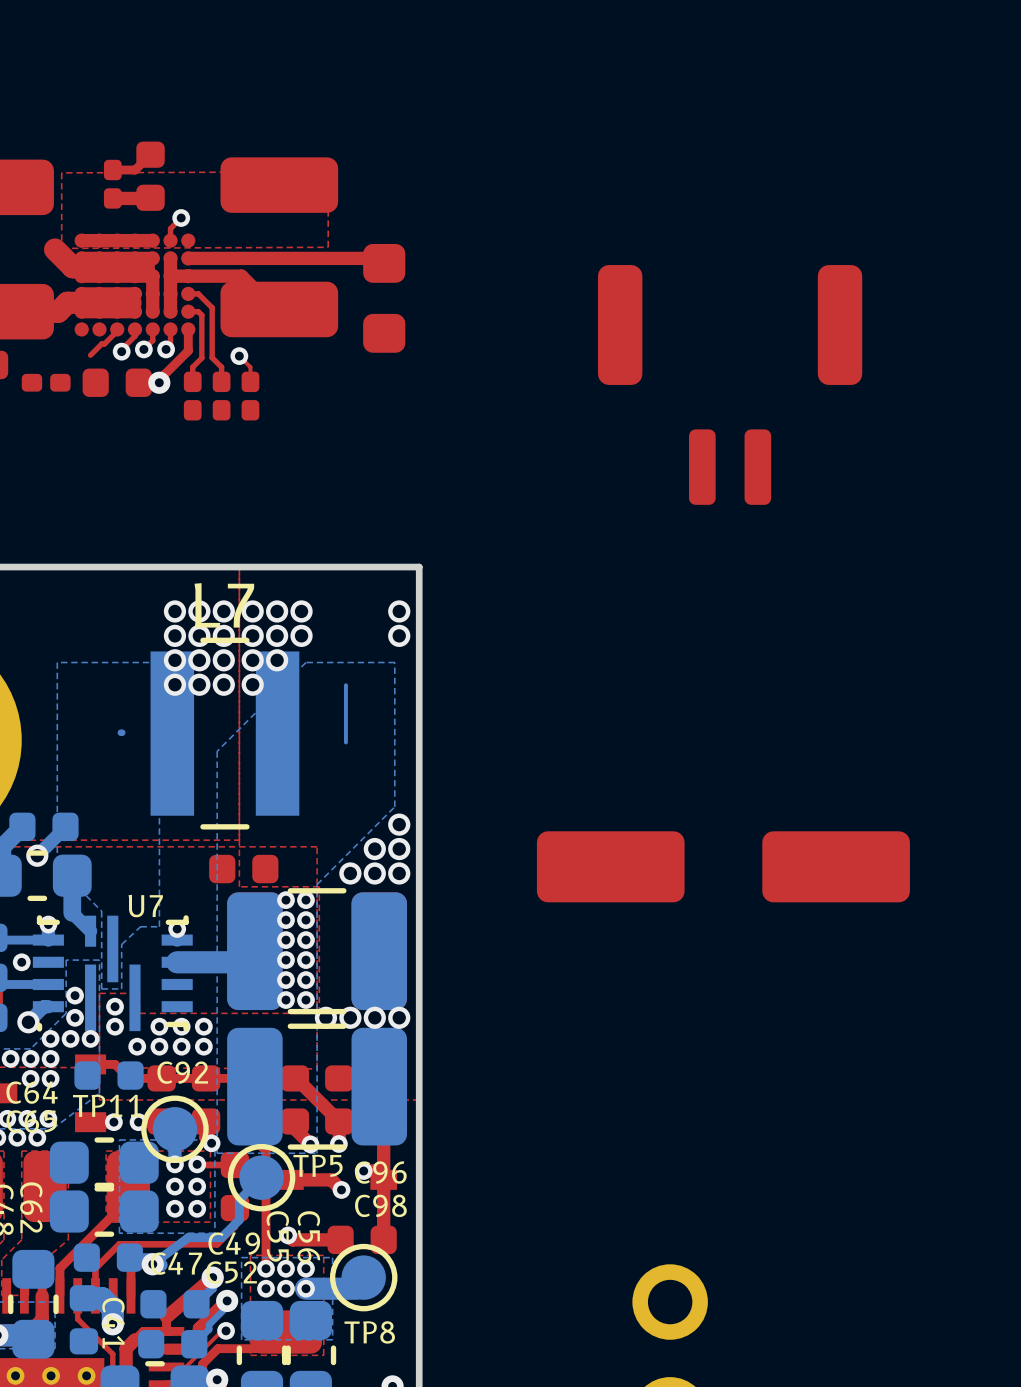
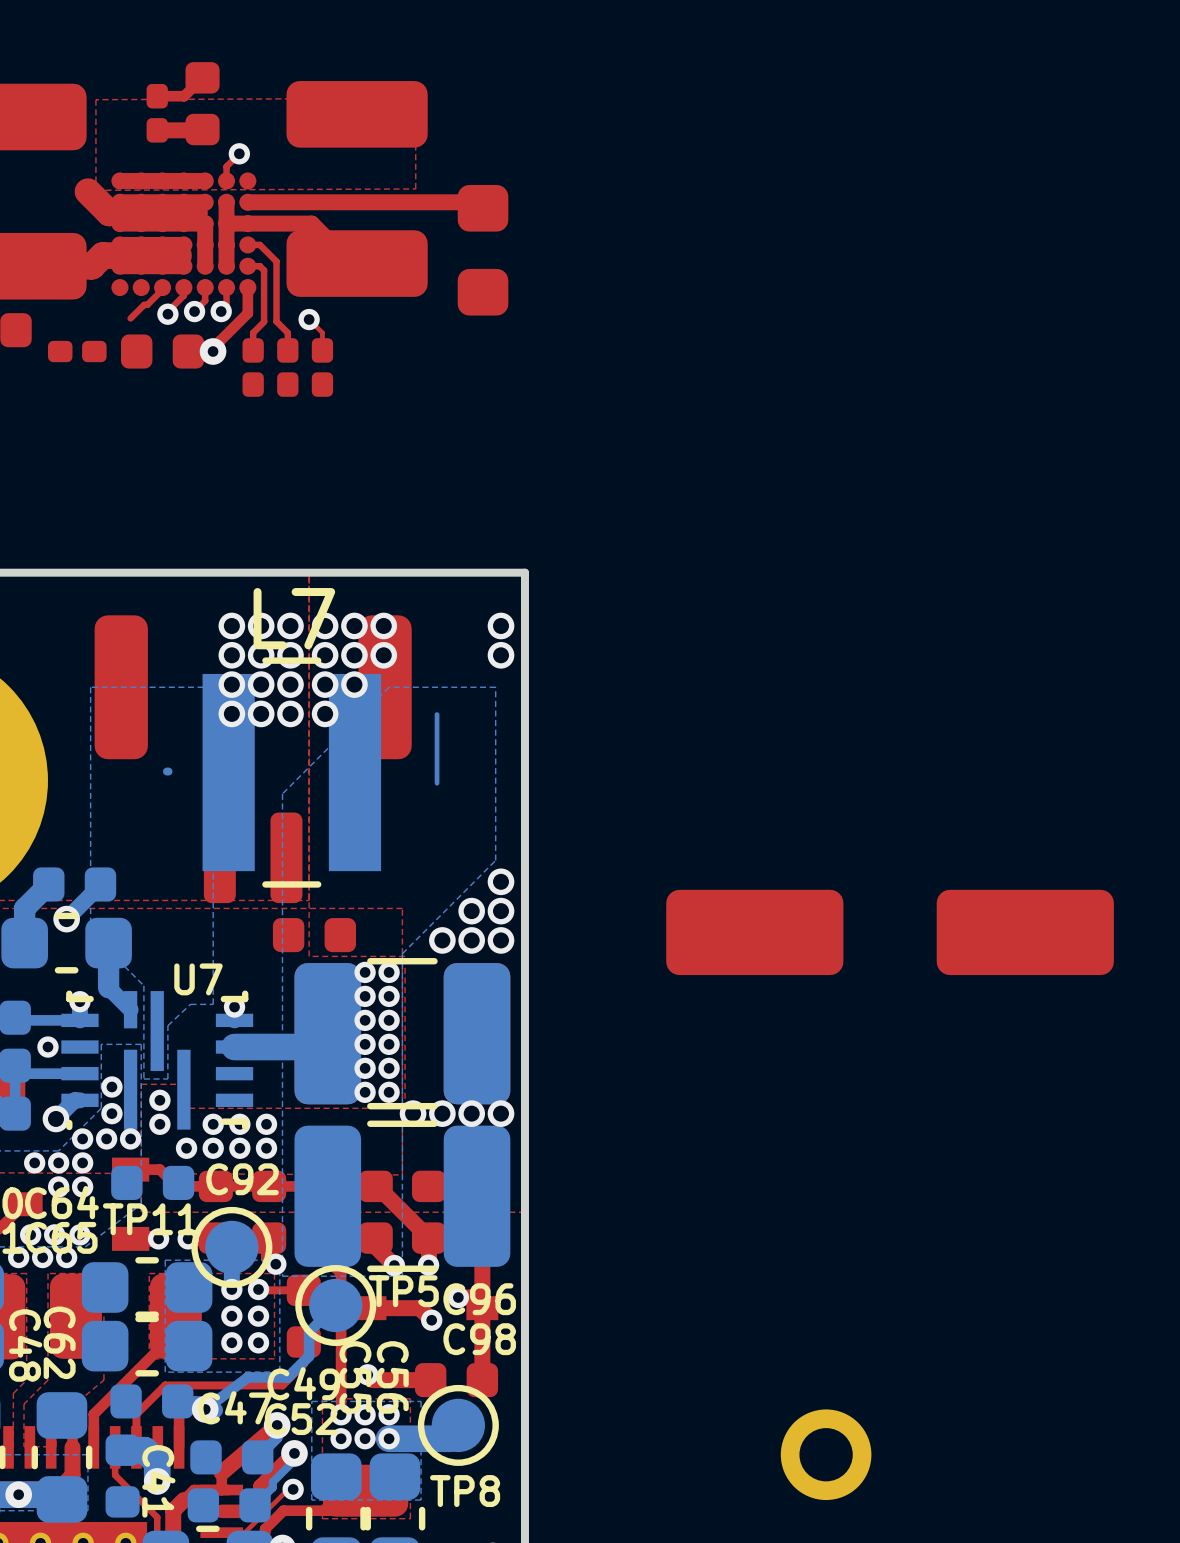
part position: (730, 384) -> (253, 759)

